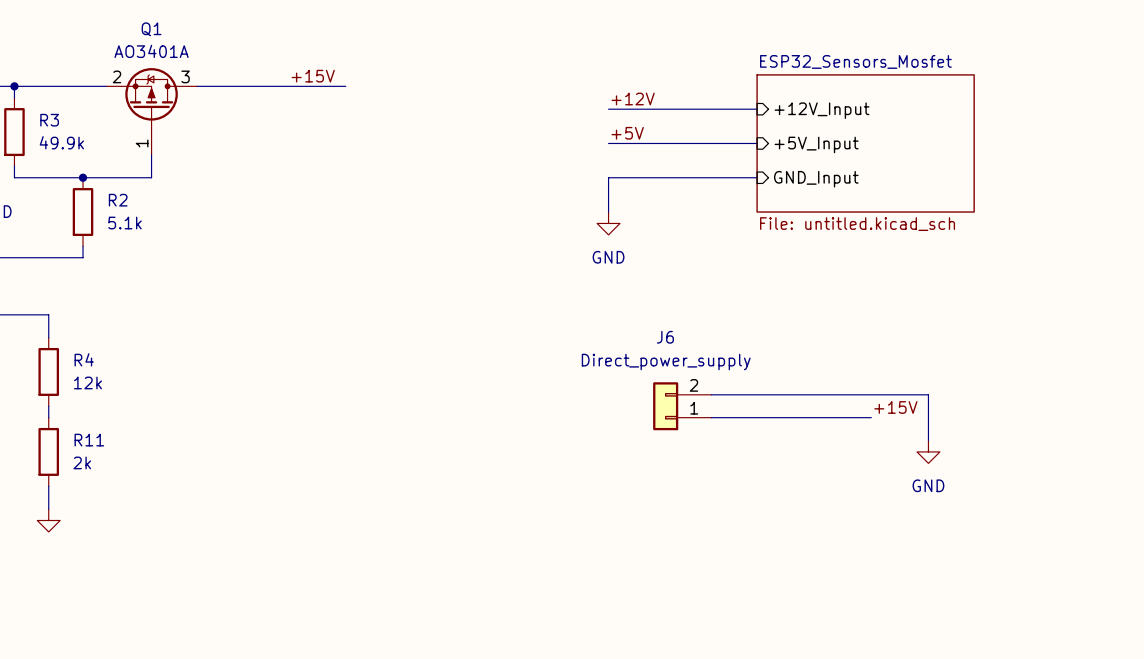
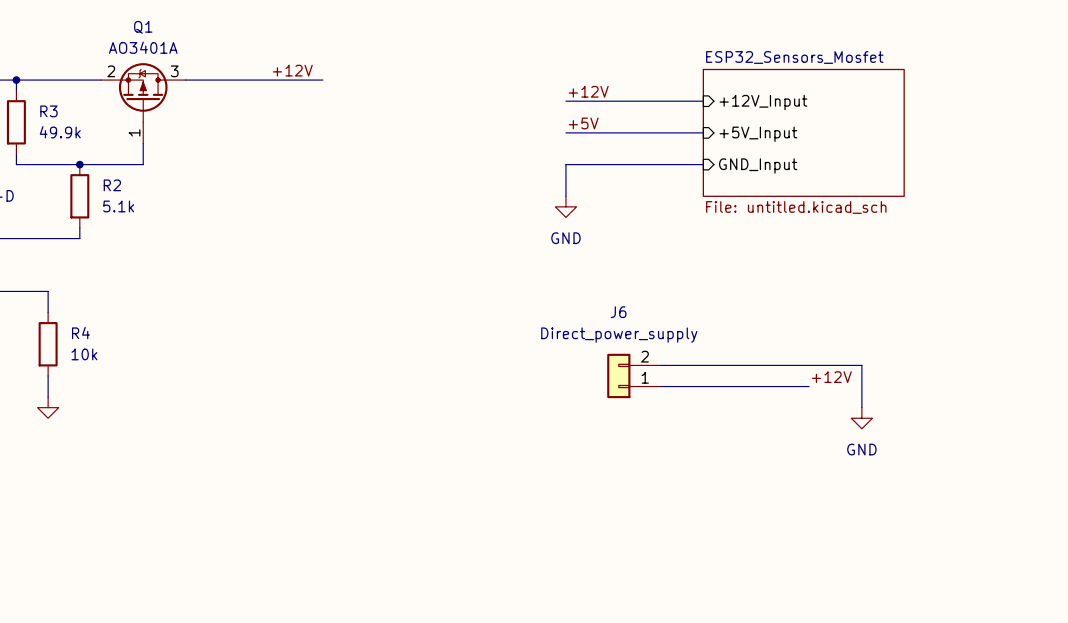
label: +15V (313, 76) -> +12V (292, 70)
R4 value: 12k (87, 382) -> 10k (84, 354)
label: +15V (895, 407) -> +12V (831, 377)
R11: 2k (48, 451) -> none
wire: (48, 486) (48, 509) -> none
power symbol position: (48, 520) -> (48, 407)

